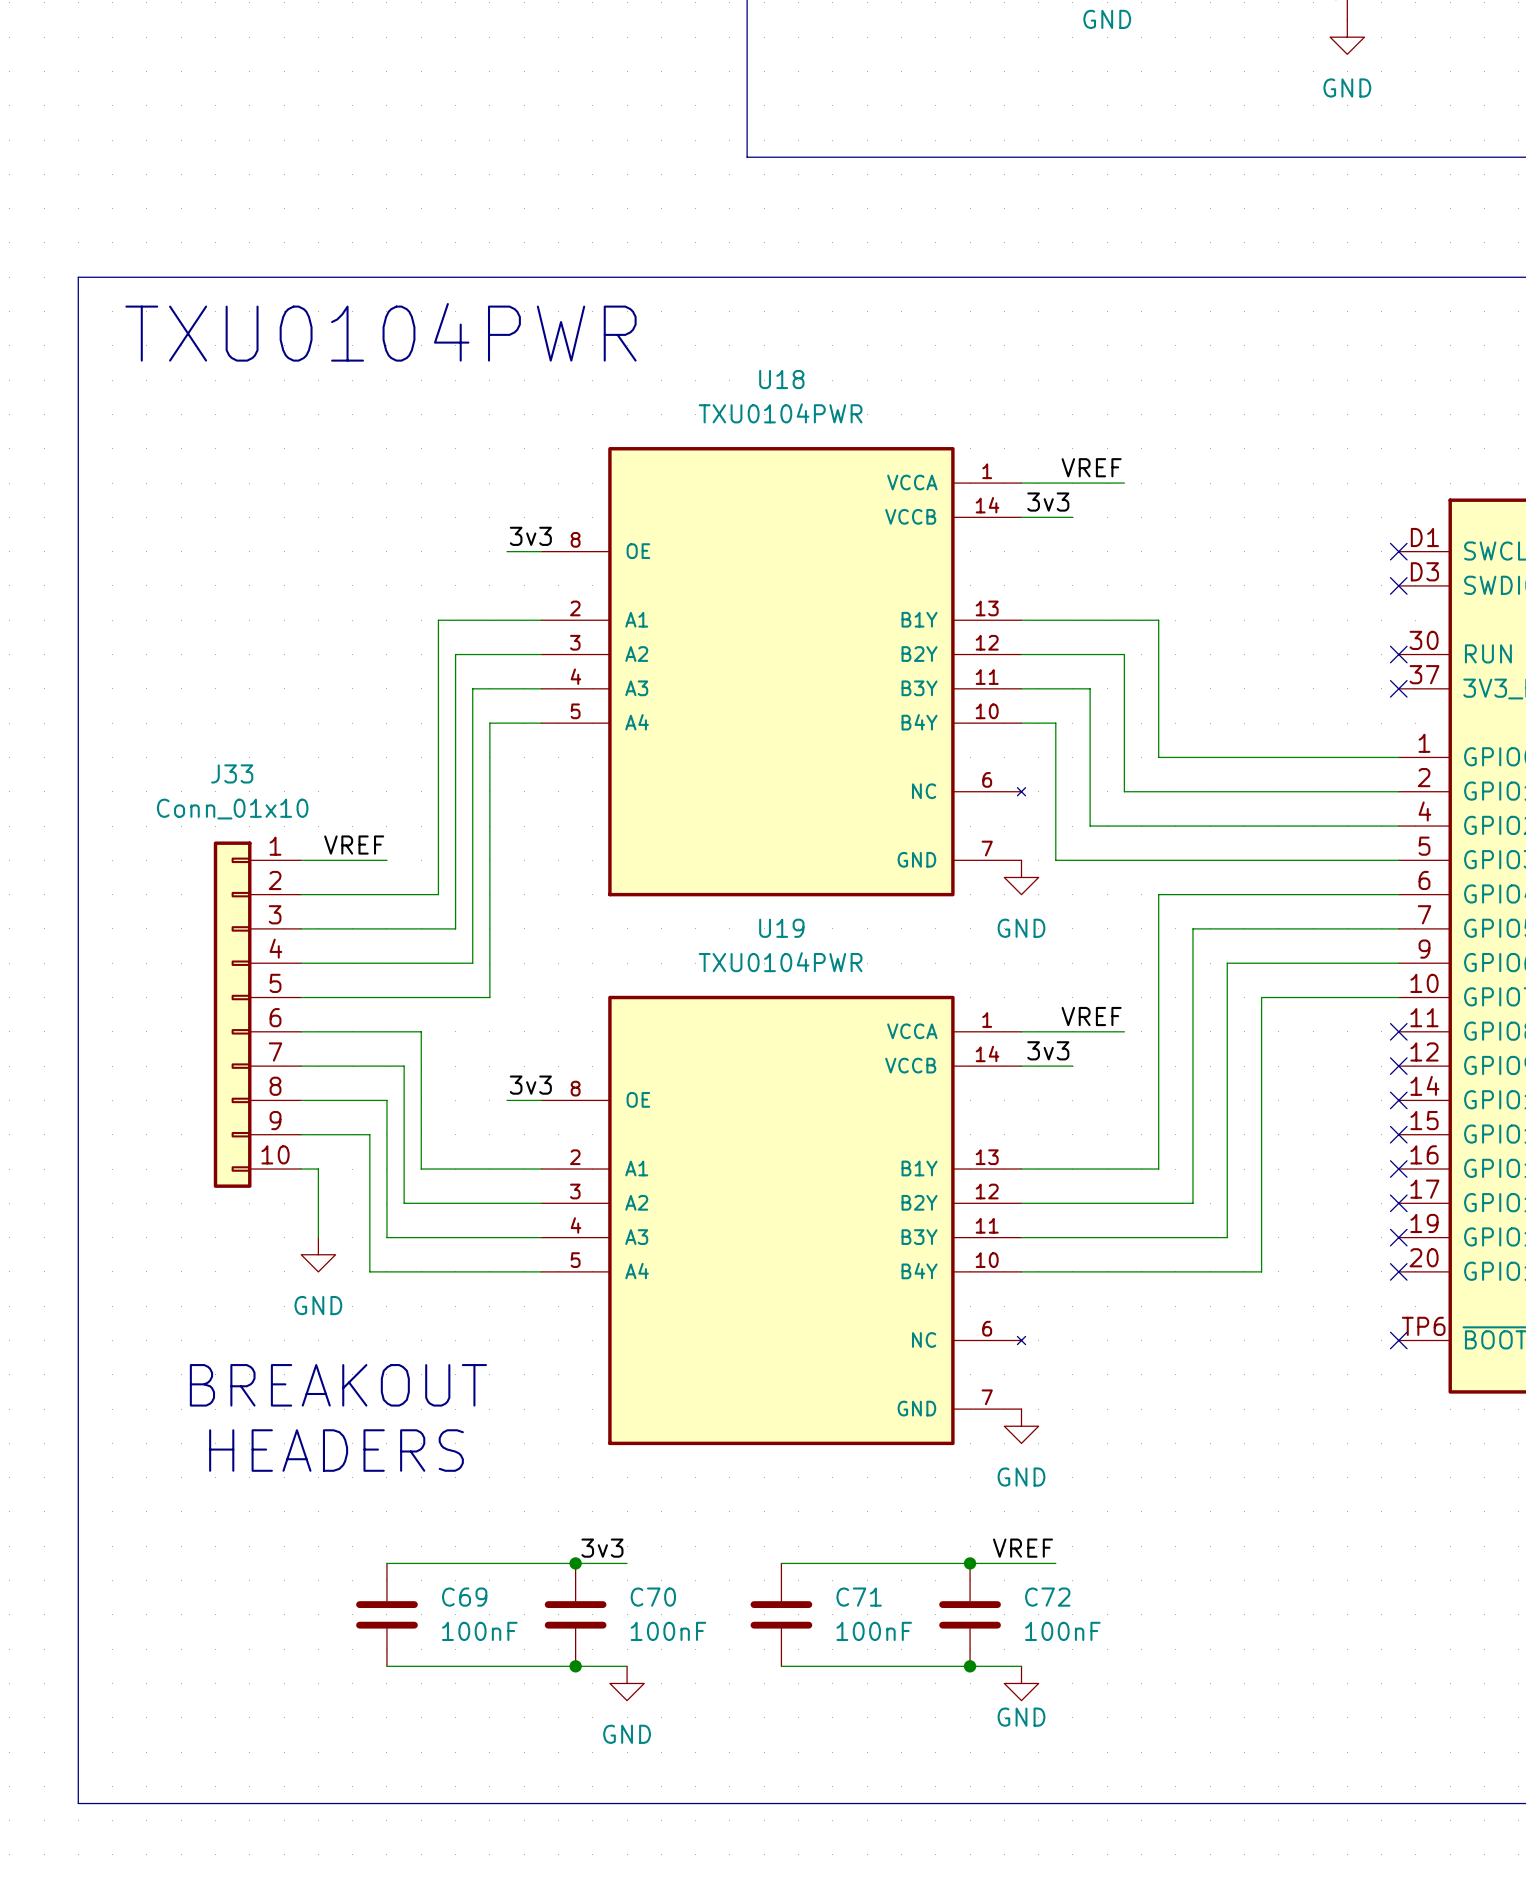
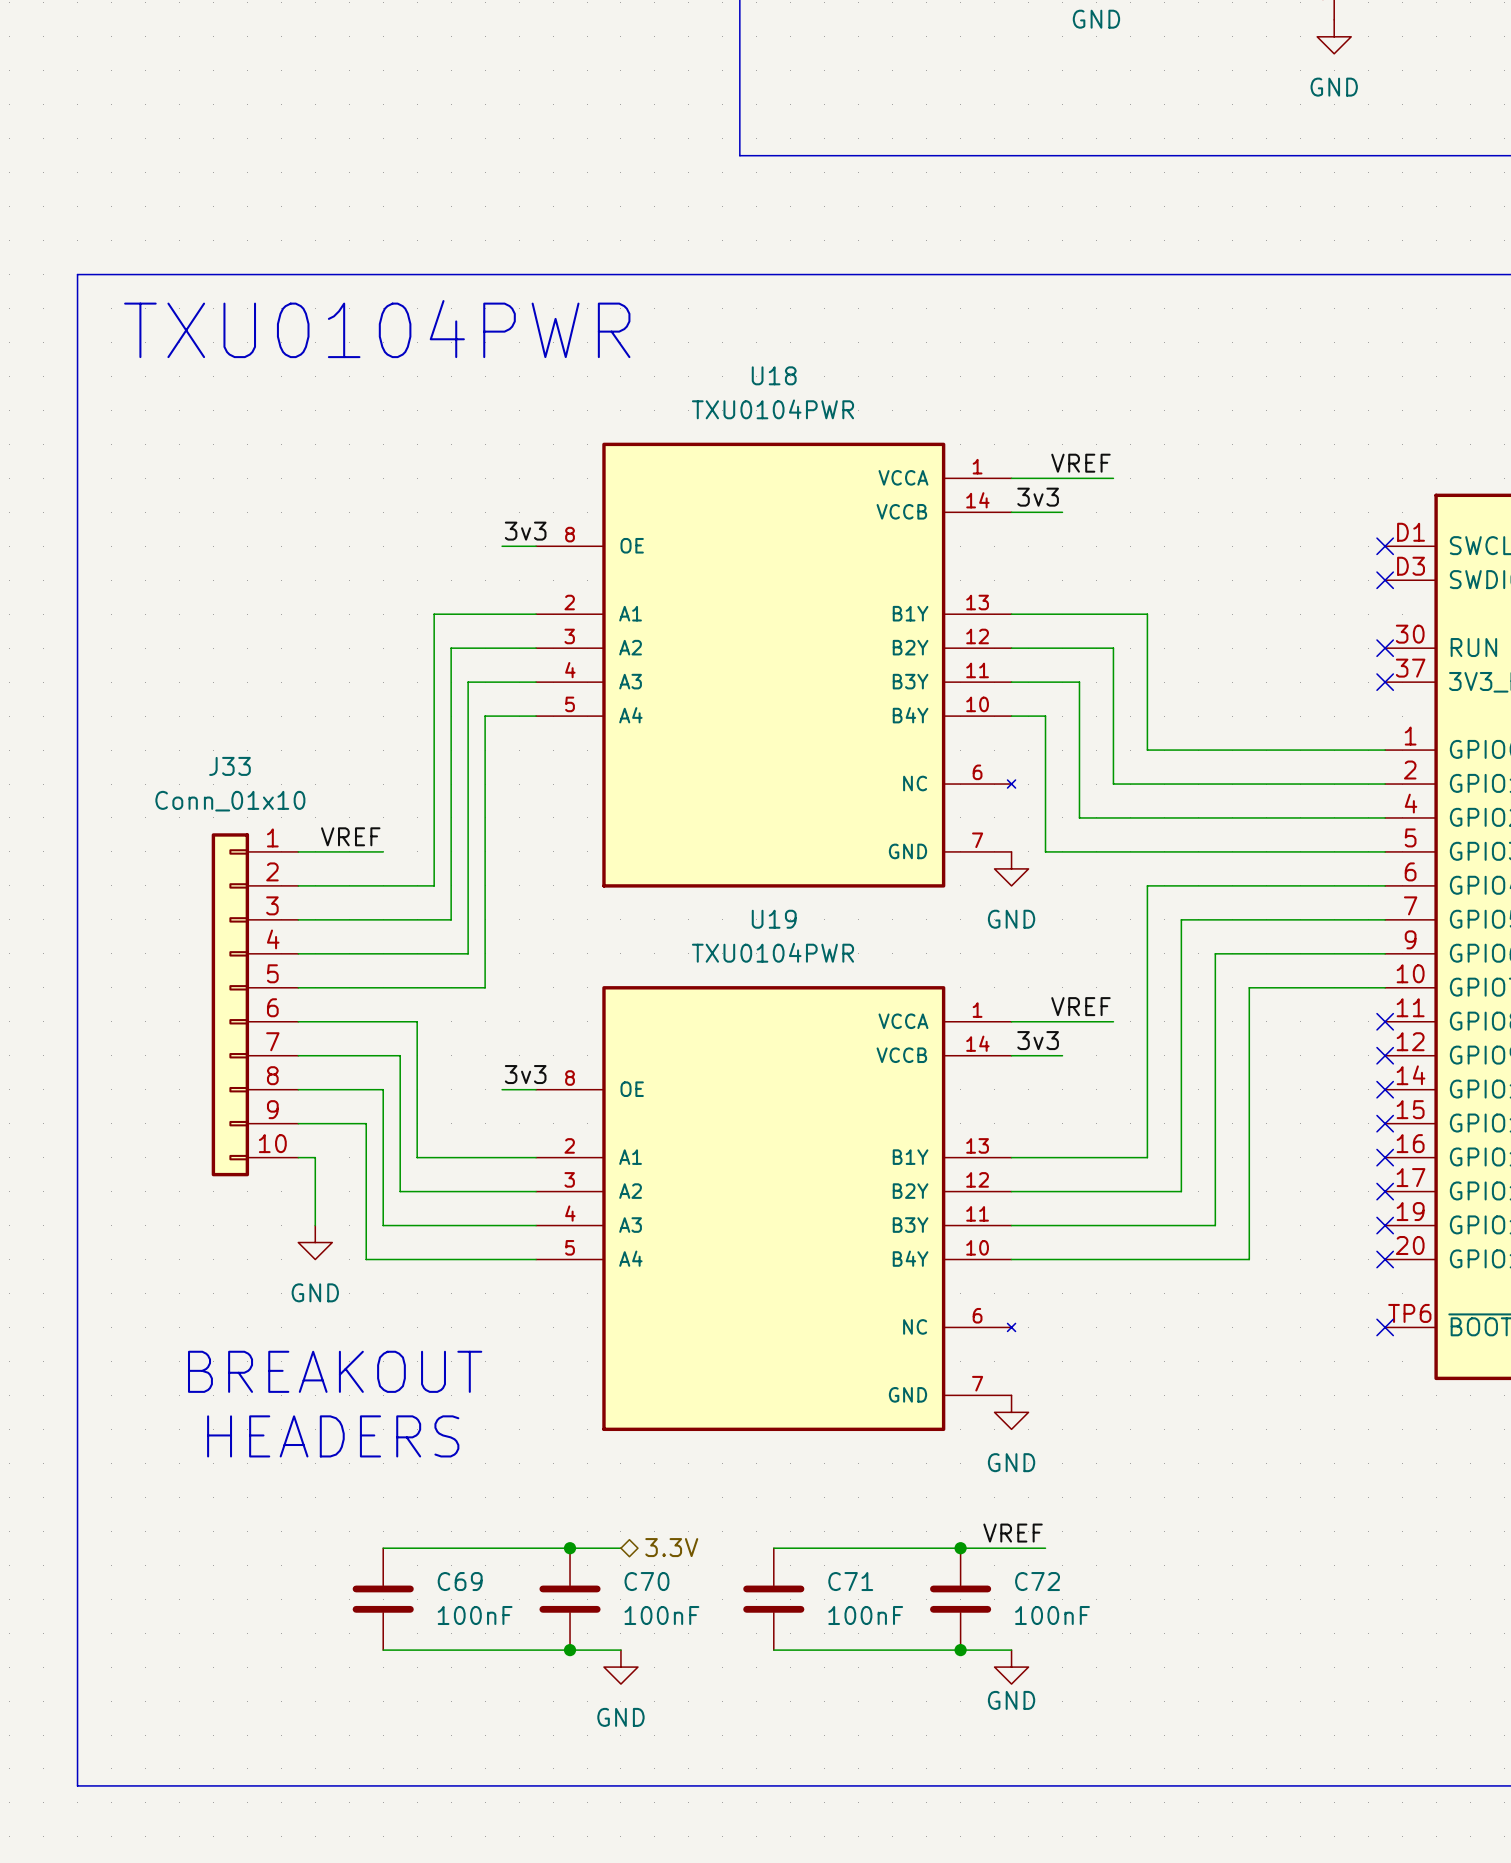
label: 3v3 (602, 1548) -> none
hierarchical label: none -> 3.3V (671, 1547)

